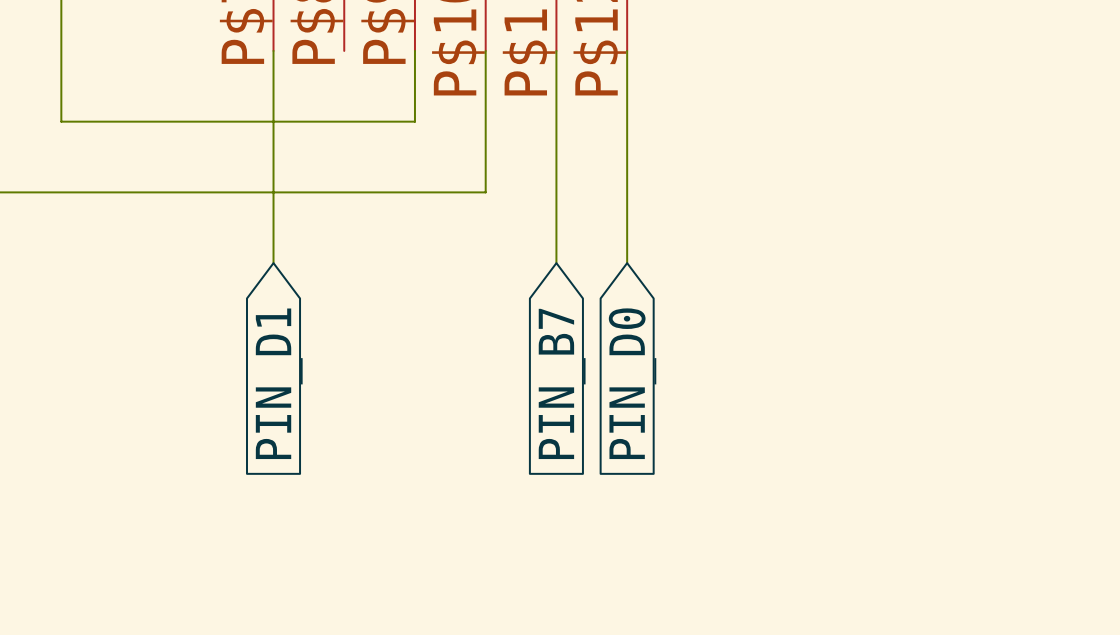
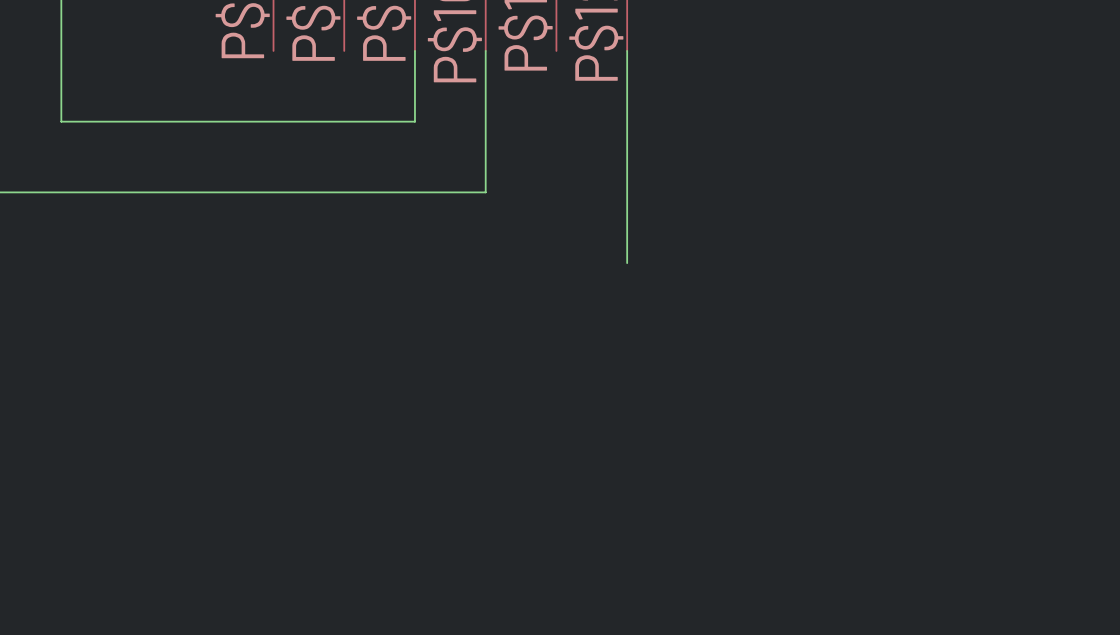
wire: (273, 50) (273, 263) -> none
wire: (556, 50) (556, 263) -> none
global label: PIN_D1 (279, 383) -> none
global label: PIN_B7 (562, 383) -> none
global label: PIN_D0 (632, 383) -> none

